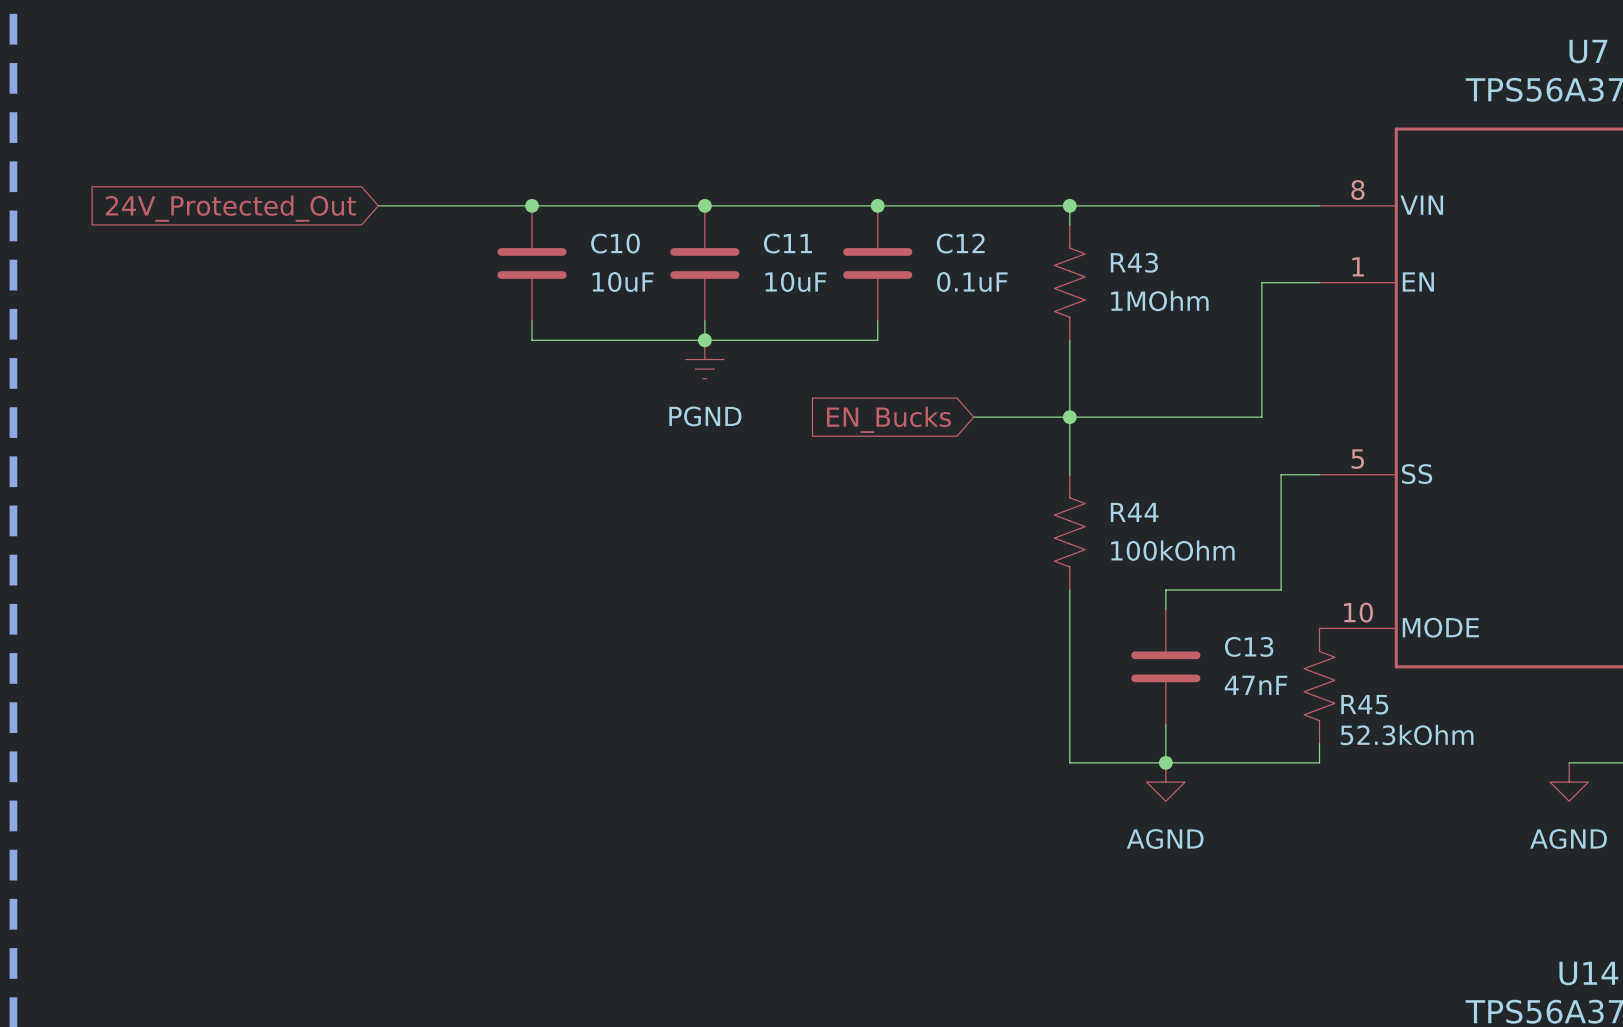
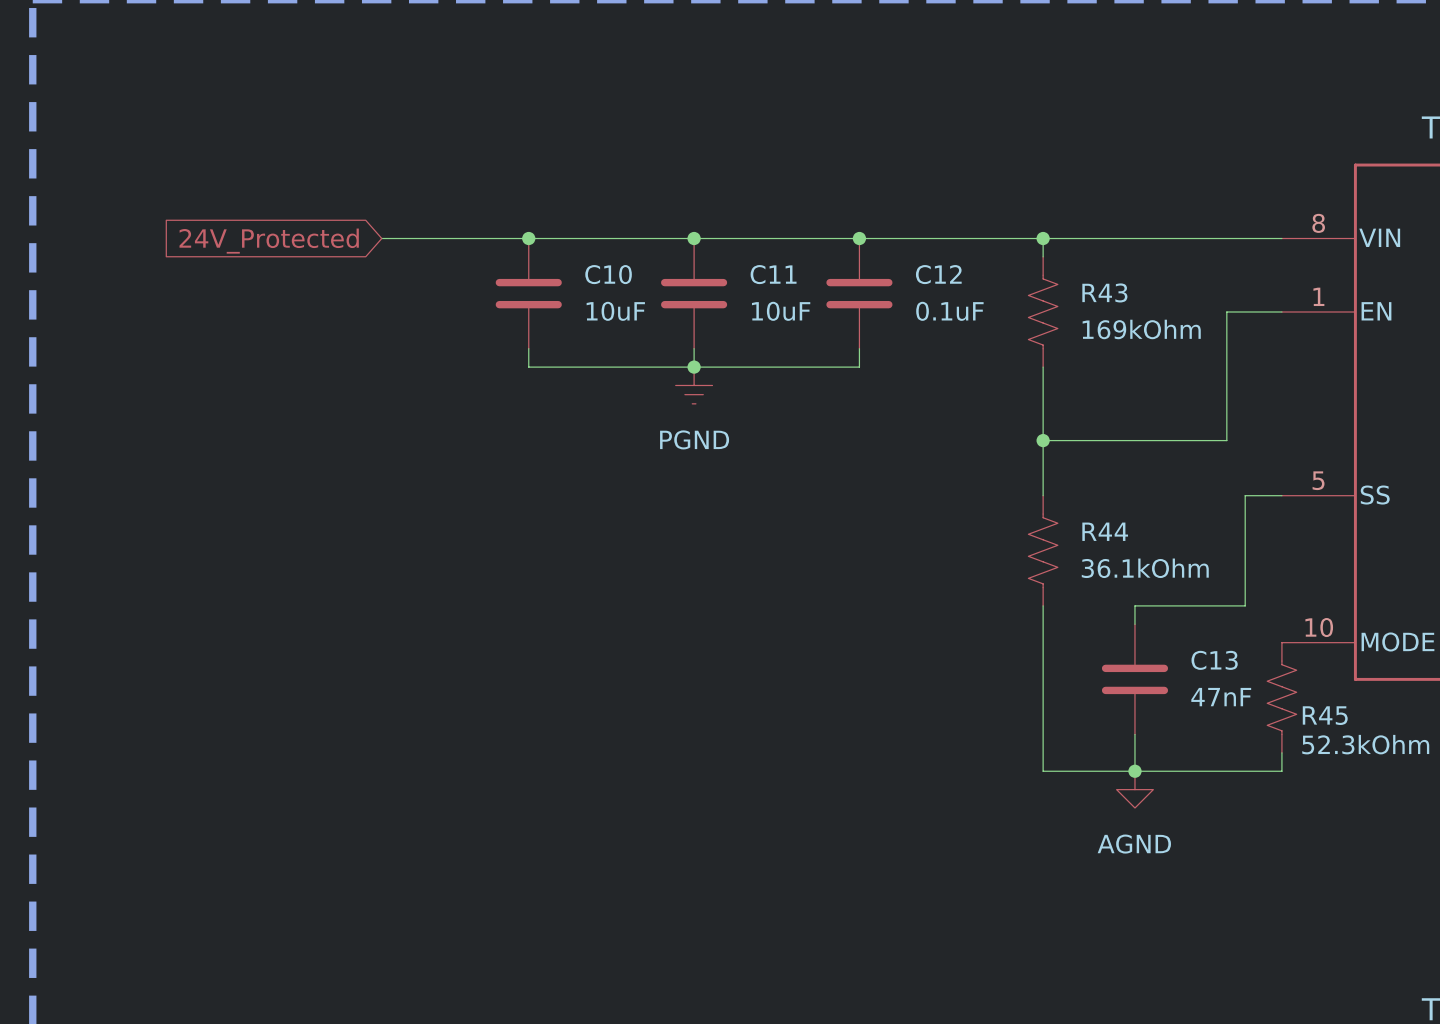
global label: 24V_Protected_Out (231, 208) -> 24V_Protected (269, 241)
R43 value: 1MOhm (1159, 300) -> 169kOhm (1141, 329)
wire: (973, 417) (1069, 417) -> none
global label: EN_Bucks (888, 419) -> none
R44 value: 100kOhm (1172, 550) -> 36.1kOhm (1145, 568)

